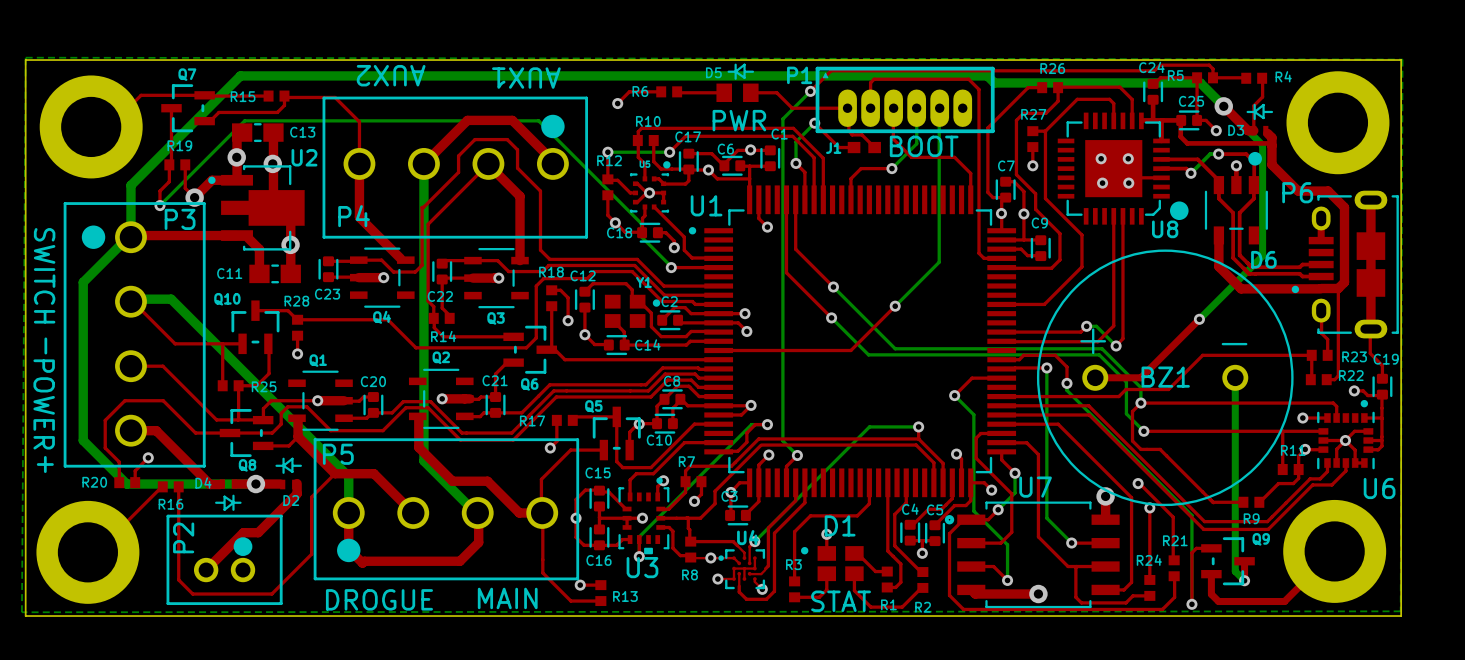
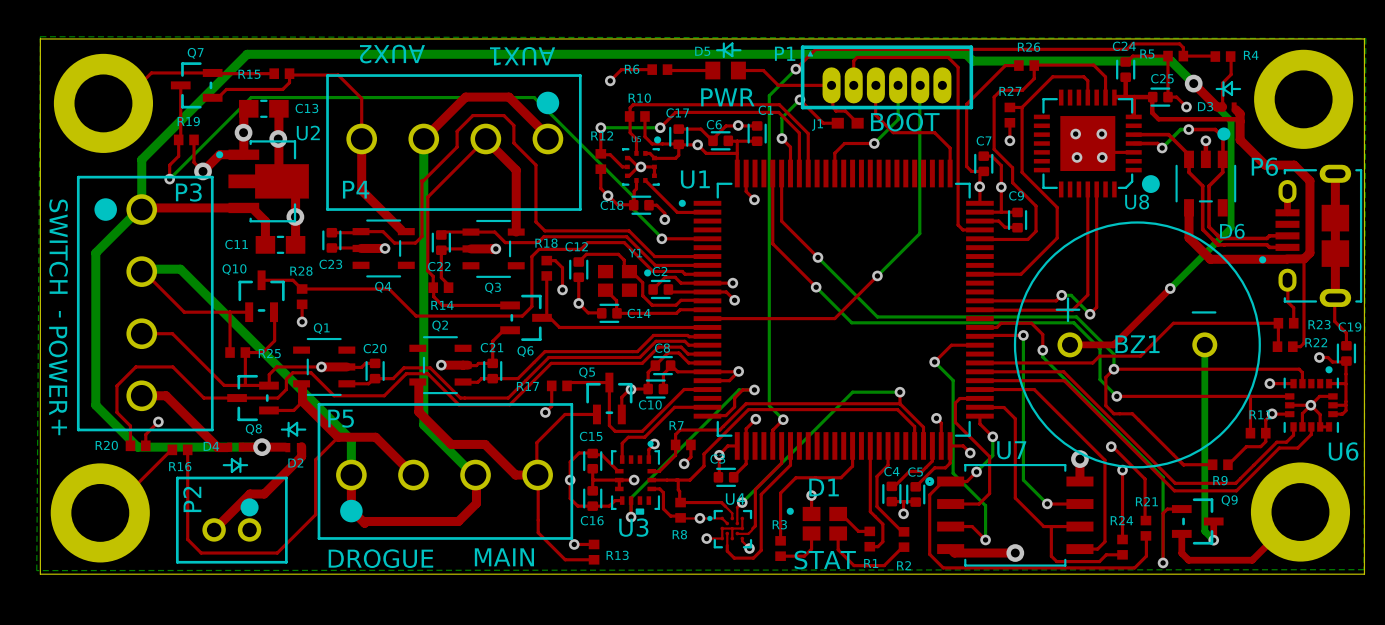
top track: (684, 237) (684, 250) (692, 257) (708, 257) -> (674, 209) (677, 212) (701, 212)

